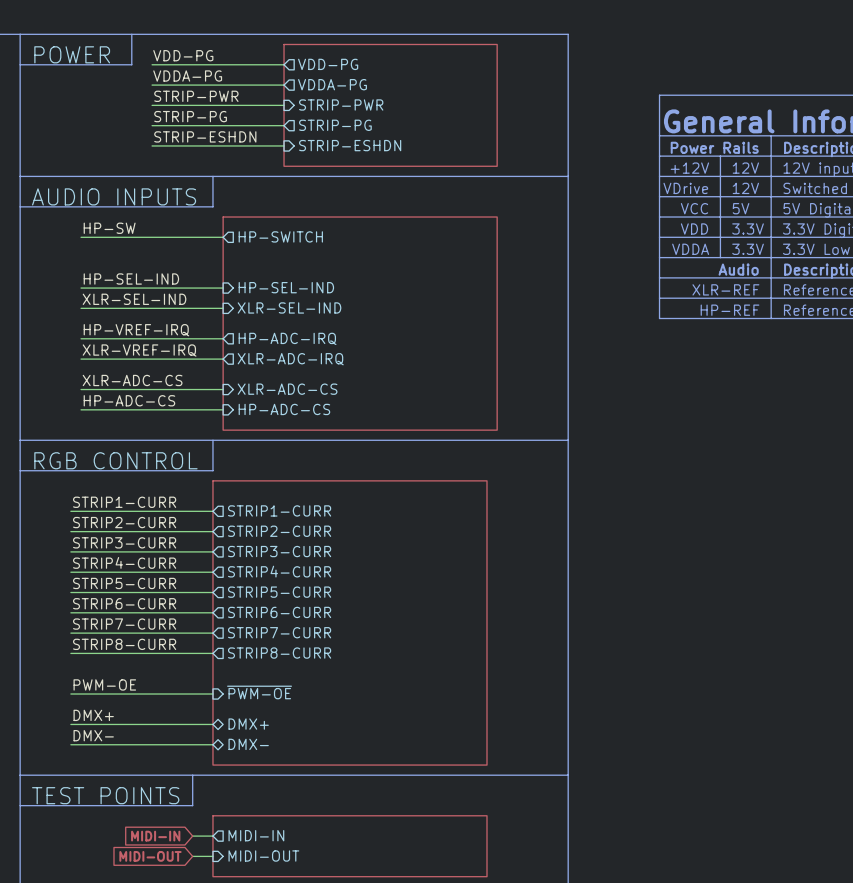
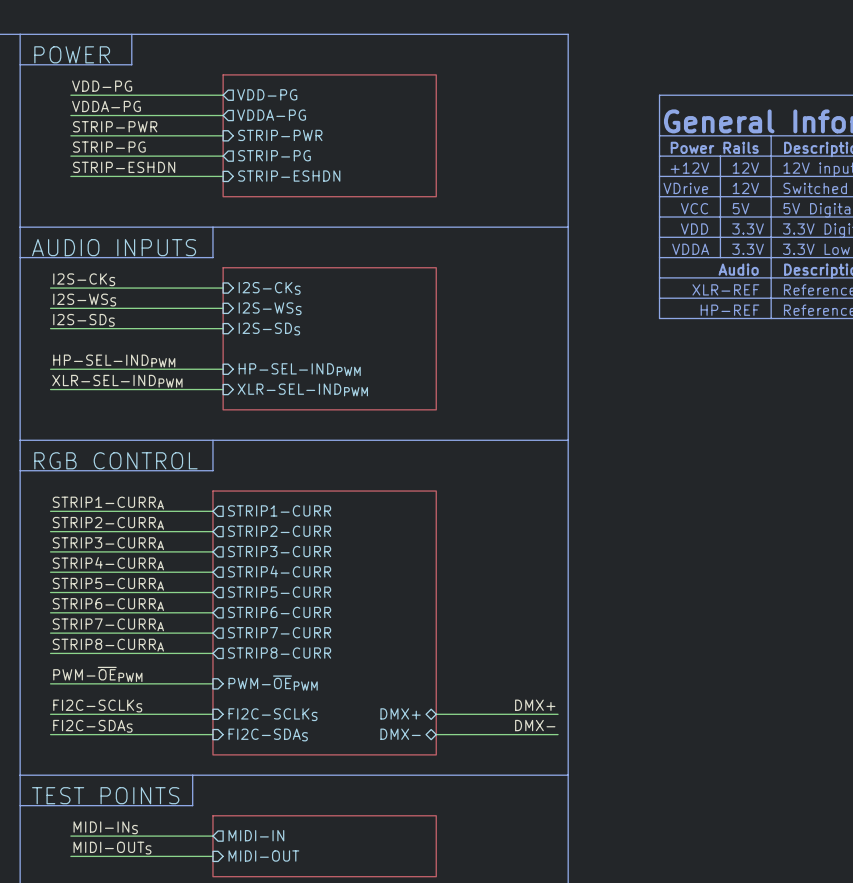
label position: VDD-PG (183, 55) -> VDD-PG (102, 86)
wire: (152, 64) (284, 64) -> none
sheet pin position: VDD-PG (328, 64) -> VDD-PG (267, 94)
label position: VDDA-PG (187, 76) -> VDDA-PG (106, 106)
sheet pin position: VDDA-PG (332, 84) -> VDDA-PG (271, 115)
wire: (152, 85) (284, 85) -> none
wire: none -> (70, 95) (223, 95)
label position: STRIP-PWR (196, 96) -> STRIP-PWR (115, 126)
sheet pin position: STRIP-PWR (341, 104) -> STRIP-PWR (280, 135)
wire: (152, 105) (284, 105) -> none
sheet POWER position: (390, 105) -> (329, 135)
wire: none -> (70, 115) (223, 115)
label position: STRIP-PG (190, 116) -> STRIP-PG (109, 147)
wire: (152, 125) (284, 125) -> none
sheet pin position: STRIP-PG (335, 125) -> STRIP-PG (274, 155)
wire: none -> (70, 135) (223, 135)
label position: STRIP-ESHDN (205, 136) -> STRIP-ESHDN (124, 167)
wire: (152, 145) (284, 145) -> none
sheet pin position: STRIP-ESHDN (350, 145) -> STRIP-ESHDN (289, 176)
wire: none -> (70, 156) (223, 156)
line: (20, 176) (568, 176) -> (20, 227) (568, 227)
line: (212, 176) (212, 206) (20, 206) -> (212, 227) (212, 257) (20, 257)
label: HP-SW (109, 228) -> none
sheet pin: HP-SWITCH (280, 236) -> none
wire: (81, 237) (223, 237) -> none
label: HP-SEL-IND (131, 278) -> none
label: none -> I2S-CKS (84, 279)
sheet pin: HP-SEL-IND (286, 287) -> I2S-CKS (269, 288)
wire: none -> (50, 288) (81, 288)
label: XLR-SEL-IND (134, 299) -> none
label: none -> I2S-WSS (84, 300)
sheet pin: XLR-SEL-IND (289, 307) -> I2S-WSS (270, 308)
wire: none -> (50, 308) (81, 308)
label: none -> I2S-SDS (83, 320)
sheet AUDIO INPUTS: (360, 323) -> none
wire: none -> (50, 328) (223, 328)
sheet pin: none -> I2S-SDS (269, 329)
label: HP-VREF-IRQ (136, 330) -> none
wire: (81, 338) (223, 338) -> none
sheet pin: HP-ADC-IRQ (287, 338) -> none
sheet AUDIO INPUTS: none -> (329, 338)
label: XLR-VREF-IRQ (139, 350) -> none
wire: (81, 359) (223, 359) -> none
sheet pin: XLR-ADC-IRQ (290, 359) -> none
label: none -> HP-SEL-INDPWM (114, 360)
wire: none -> (50, 369) (223, 369)
sheet pin: none -> HP-SEL-INDPWM (299, 369)
label: XLR-ADC-CS (132, 380) -> none
label: none -> XLR-SEL-INDPWM (117, 381)
wire: none -> (50, 389) (81, 389)
sheet pin: XLR-ADC-CS (287, 389) -> XLR-SEL-INDPWM (302, 389)
label: HP-ADC-CS (129, 400) -> none
wire: (81, 409) (223, 409) -> none
sheet pin: HP-ADC-CS (284, 409) -> none
label: STRIP1-CURR (124, 502) -> none
label: none -> STRIP1-CURRA (108, 503)
wire: none -> (50, 511) (70, 511)
label: STRIP2-CURR (124, 522) -> none
label: none -> STRIP2-CURRA (108, 523)
wire: none -> (50, 531) (70, 531)
label: STRIP3-CURR (124, 542) -> none
label: none -> STRIP3-CURRA (108, 543)
wire: none -> (50, 551) (70, 551)
label: STRIP4-CURR (124, 562) -> none
label: none -> STRIP4-CURRA (108, 563)
wire: none -> (50, 572) (70, 572)
label: STRIP5-CURR (124, 583) -> none
label: none -> STRIP5-CURRA (108, 584)
wire: none -> (50, 592) (70, 592)
label: STRIP6-CURR (124, 603) -> none
label: none -> STRIP6-CURRA (108, 604)
wire: none -> (50, 612) (70, 612)
sheet RGB CONTROL: none -> (324, 622)
sheet RGB CONTROL: (349, 622) -> none
label: none -> STRIP7-CURRA (108, 624)
label: STRIP7-CURR (124, 624) -> none
wire: none -> (50, 633) (70, 633)
label: STRIP8-CURR (124, 644) -> none
label: none -> STRIP8-CURRA (108, 645)
wire: none -> (50, 653) (70, 653)
label: none -> PWM-~{OE}PWM (97, 674)
wire: none -> (50, 683) (212, 683)
sheet pin: none -> PWM-~{OE}PWM (273, 683)
label: PWM-OE (104, 684) -> none
sheet pin: ~{PWM-OE} (259, 692) -> none
wire: (70, 694) (212, 694) -> none
label: none -> DMX+ (535, 705)
label: none -> FI2C-SCLKS (97, 706)
wire: none -> (50, 714) (212, 714)
sheet pin: none -> FI2C-SCLKS (273, 714)
wire: none -> (436, 714) (558, 714)
label: DMX+ (93, 715) -> none
wire: (70, 724) (212, 724) -> none
sheet pin rotation: 0° (248, 724) -> 180° (400, 713)
sheet pin position: DMX+ (248, 724) -> DMX+ (400, 713)
label: none -> DMX- (535, 725)
label: none -> FI2C-SDAS (92, 726)
wire: none -> (50, 734) (212, 734)
sheet pin: none -> FI2C-SDAS (268, 734)
wire: none -> (436, 734) (558, 734)
label: DMX- (93, 735) -> none
wire: (70, 744) (212, 744) -> none
sheet pin rotation: 0° (248, 744) -> 180° (400, 734)
sheet pin position: DMX- (248, 744) -> DMX- (400, 734)
label: none -> MIDI-INS (105, 827)
wire: none -> (70, 836) (192, 836)
global label: MIDI-IN (155, 836) -> none
sheet TEST POINTS: none -> (324, 846)
sheet TEST POINTS: (349, 846) -> none
label: none -> MIDI-OUTS (112, 848)
wire: none -> (70, 856) (192, 856)
global label: MIDI-OUT (150, 856) -> none

